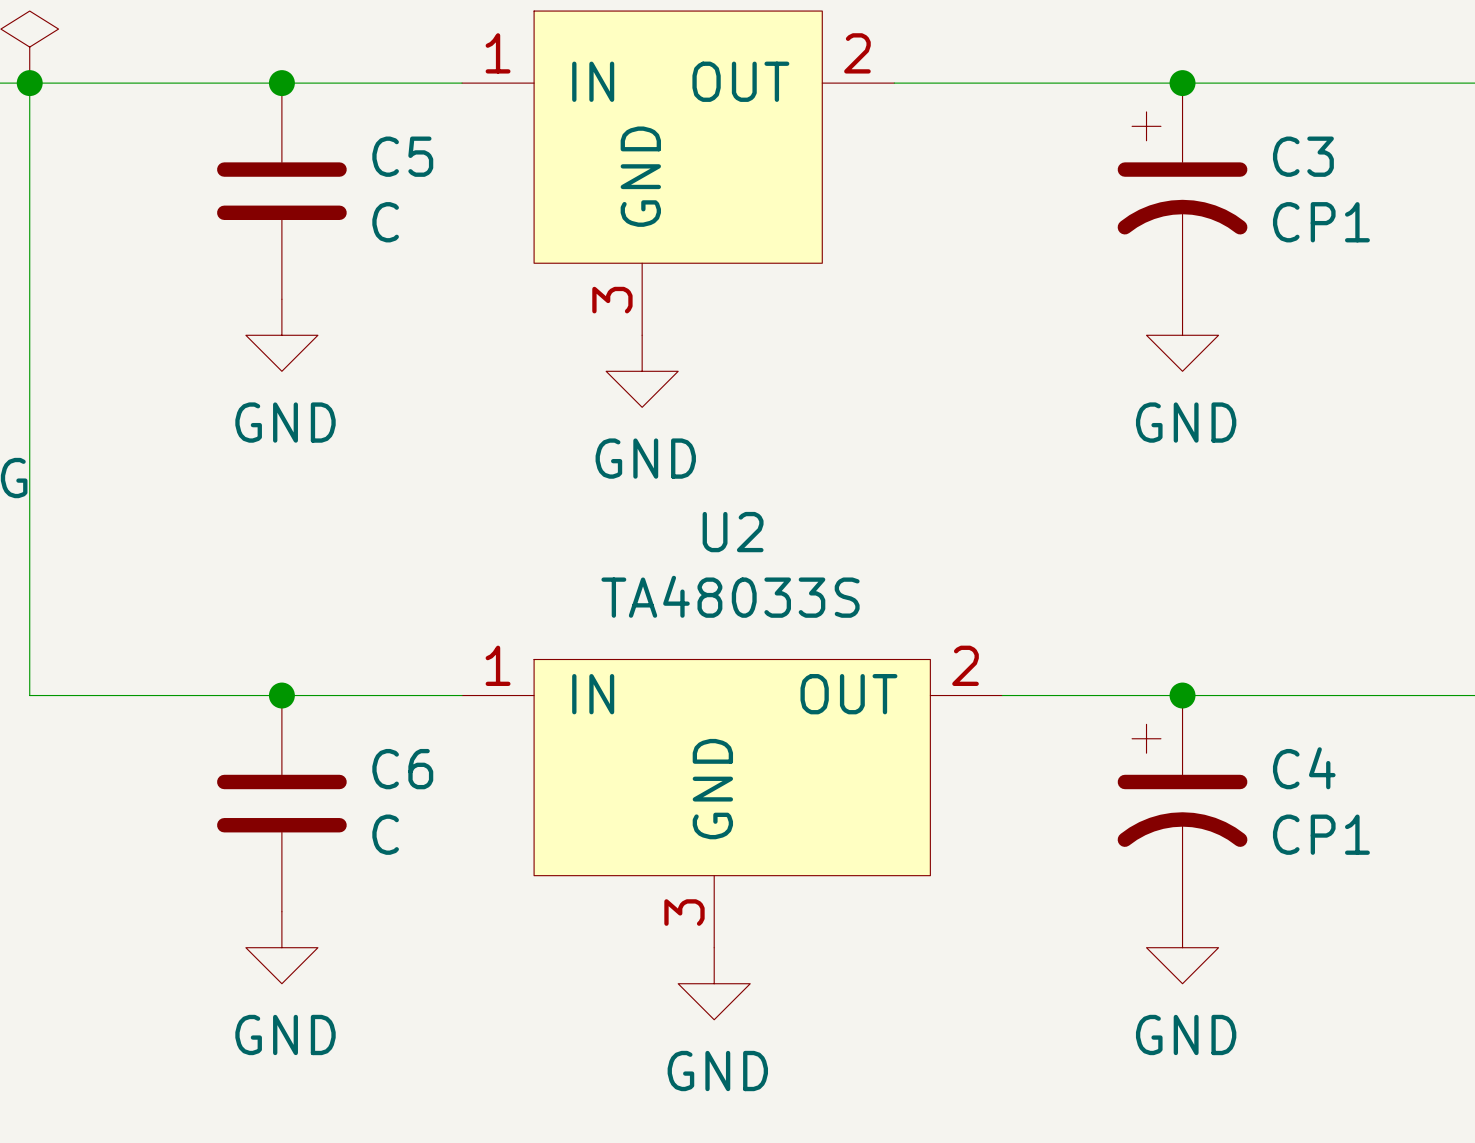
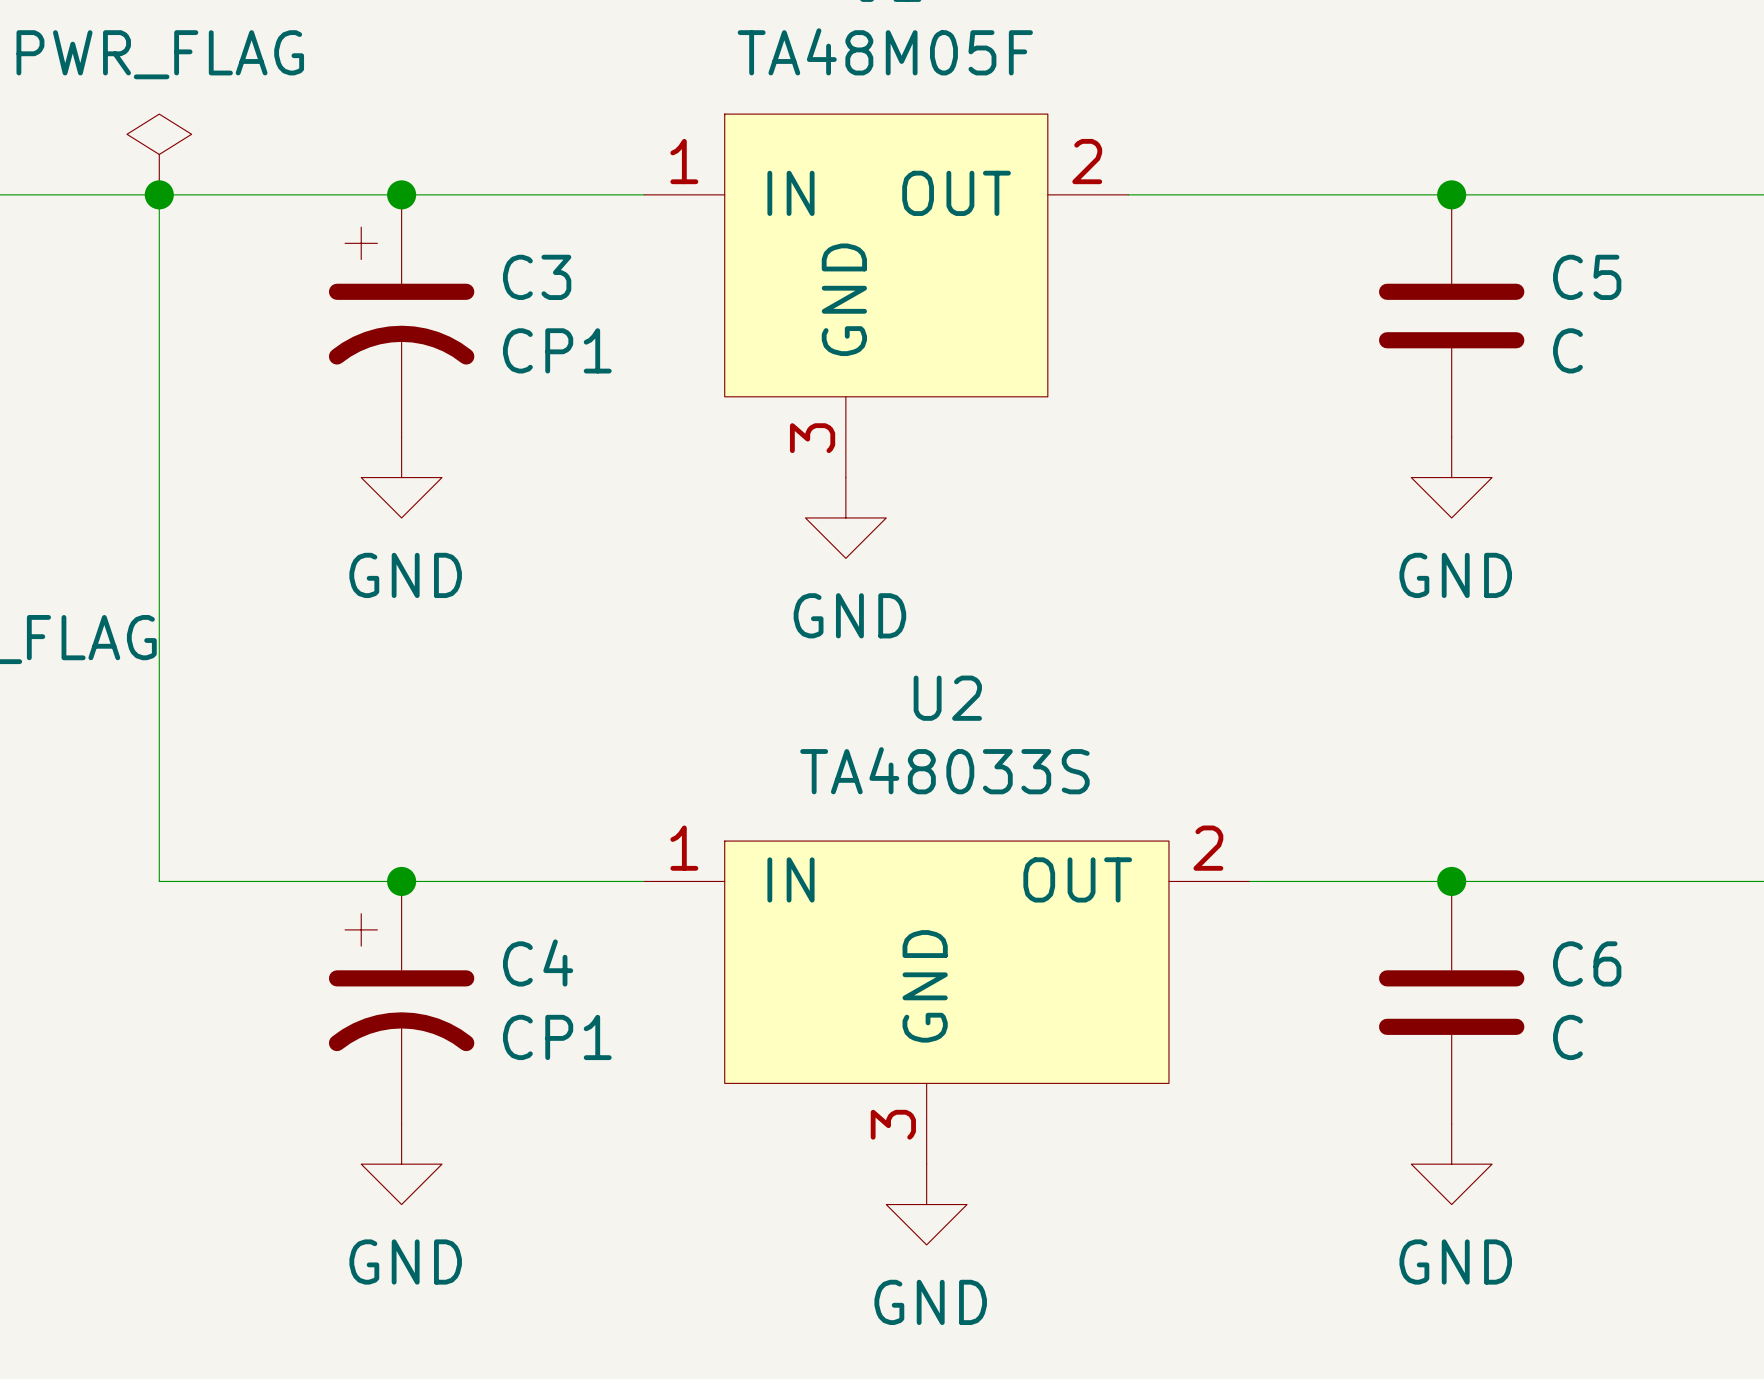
junction position: (281, 83) -> (401, 194)
C5 position: (281, 191) -> (1451, 316)
C3 position: (1182, 191) -> (401, 316)
power symbol position: GND (281, 335) -> GND (401, 477)
junction position: (281, 695) -> (401, 881)
C6 position: (281, 803) -> (1451, 1002)
C4 position: (1182, 803) -> (401, 1002)
power symbol position: GND (281, 947) -> GND (401, 1164)

